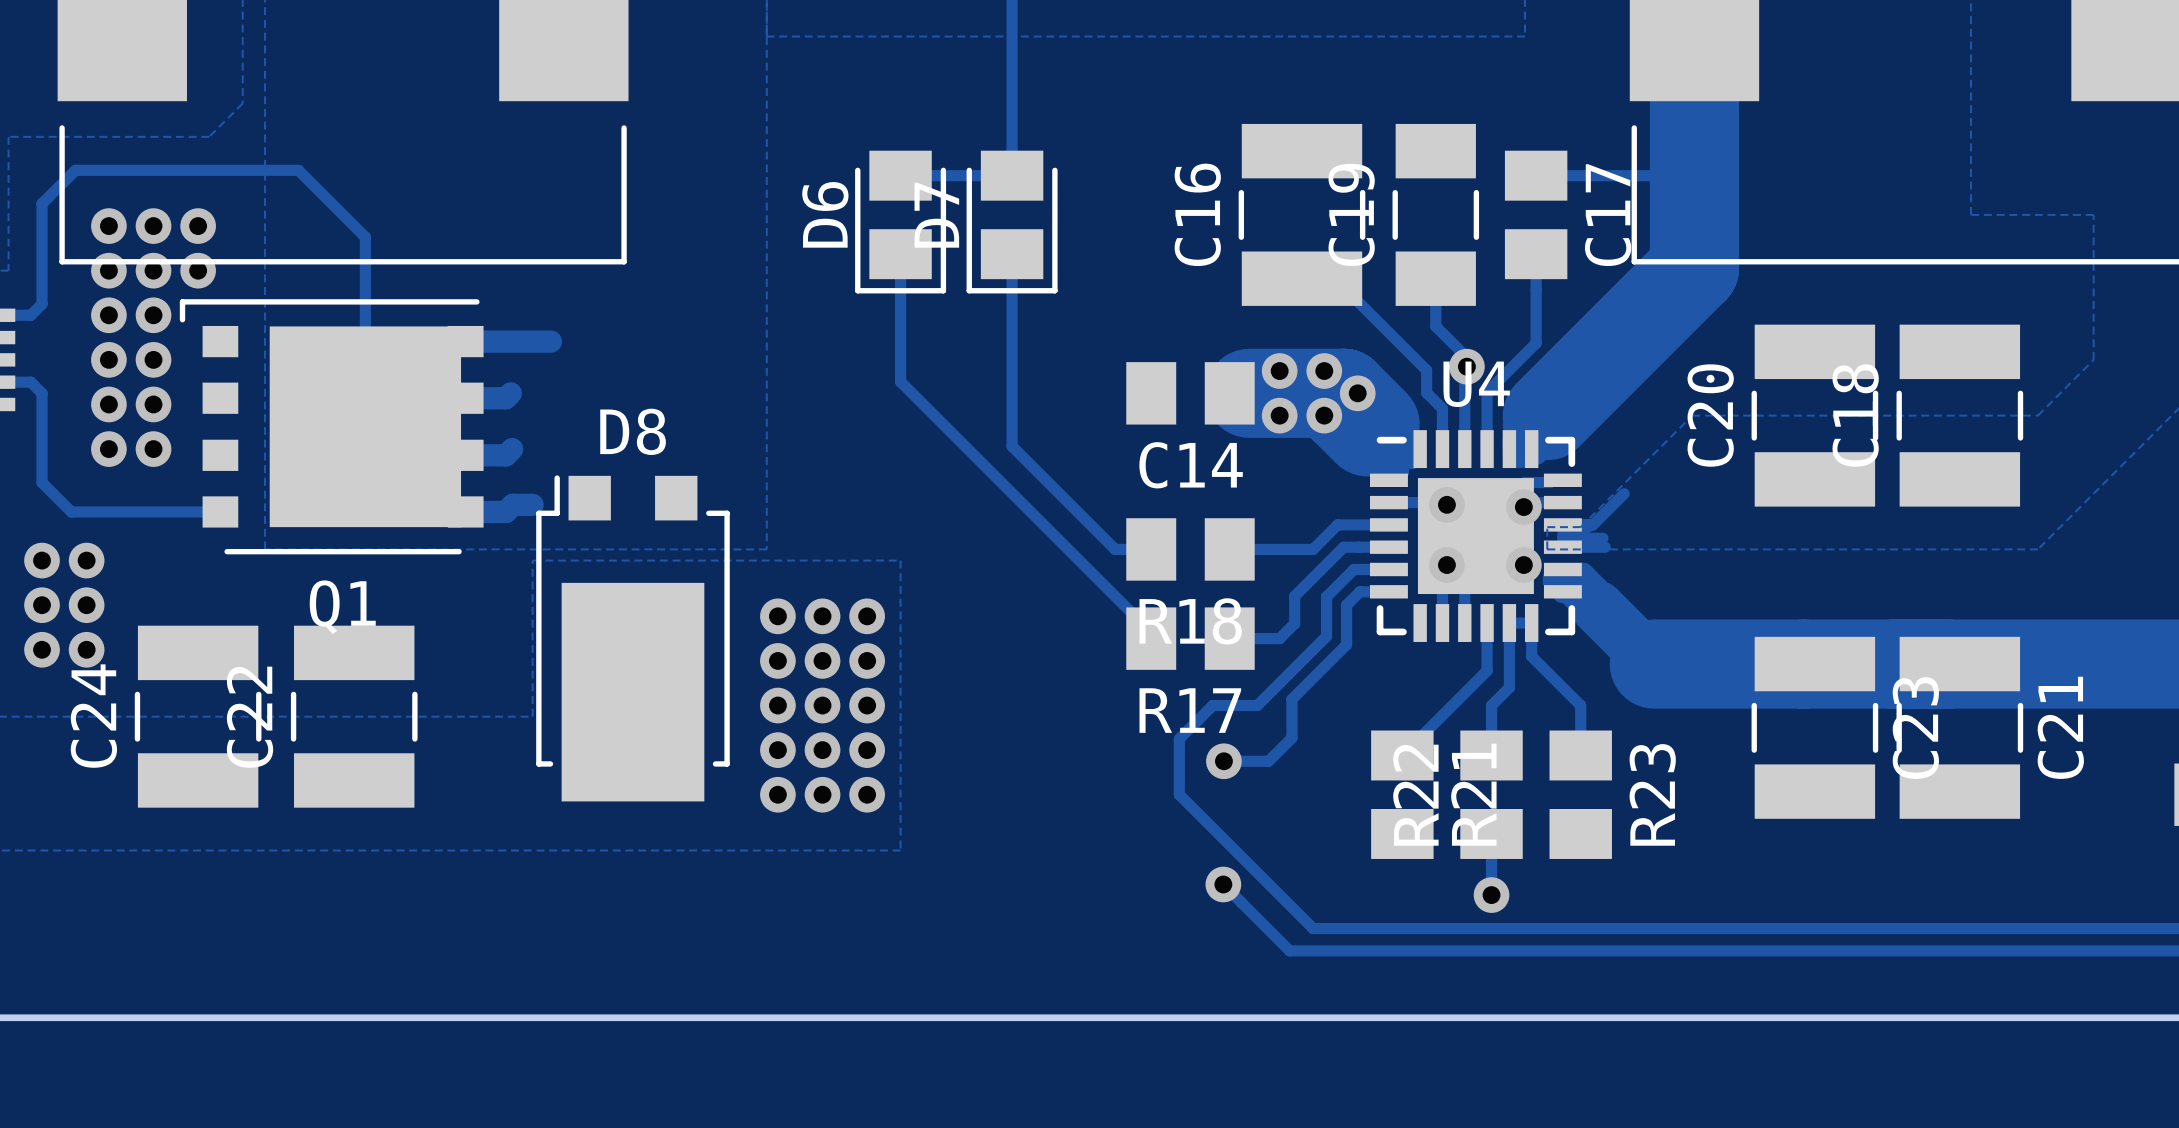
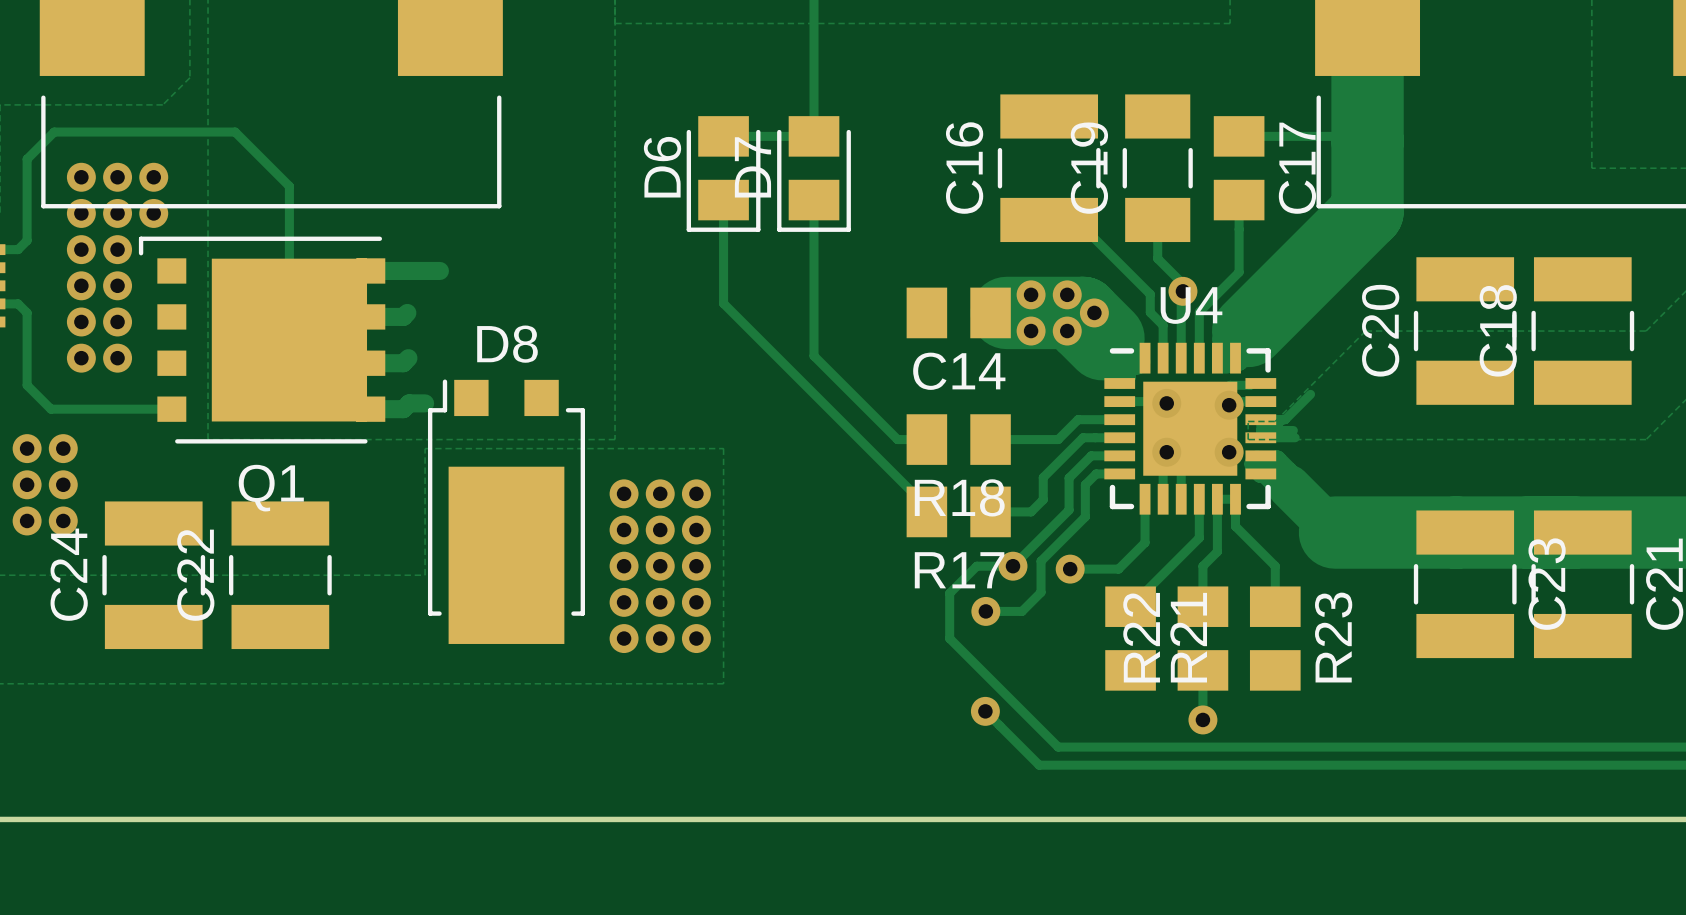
track: none -> (1145, 499) (1145, 542) (1118, 569) (1070, 569)
via: none -> (1012, 566)
via: none -> (1070, 569)

